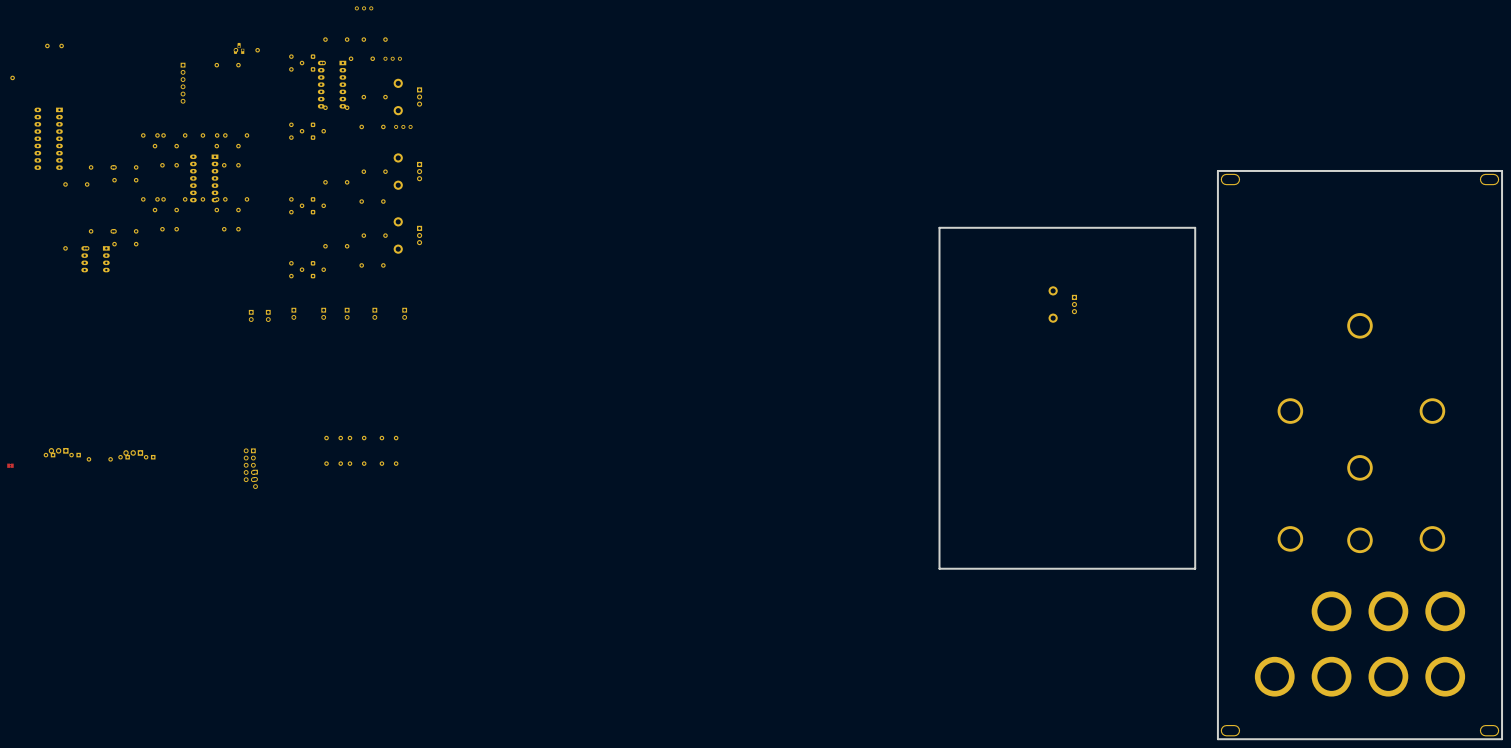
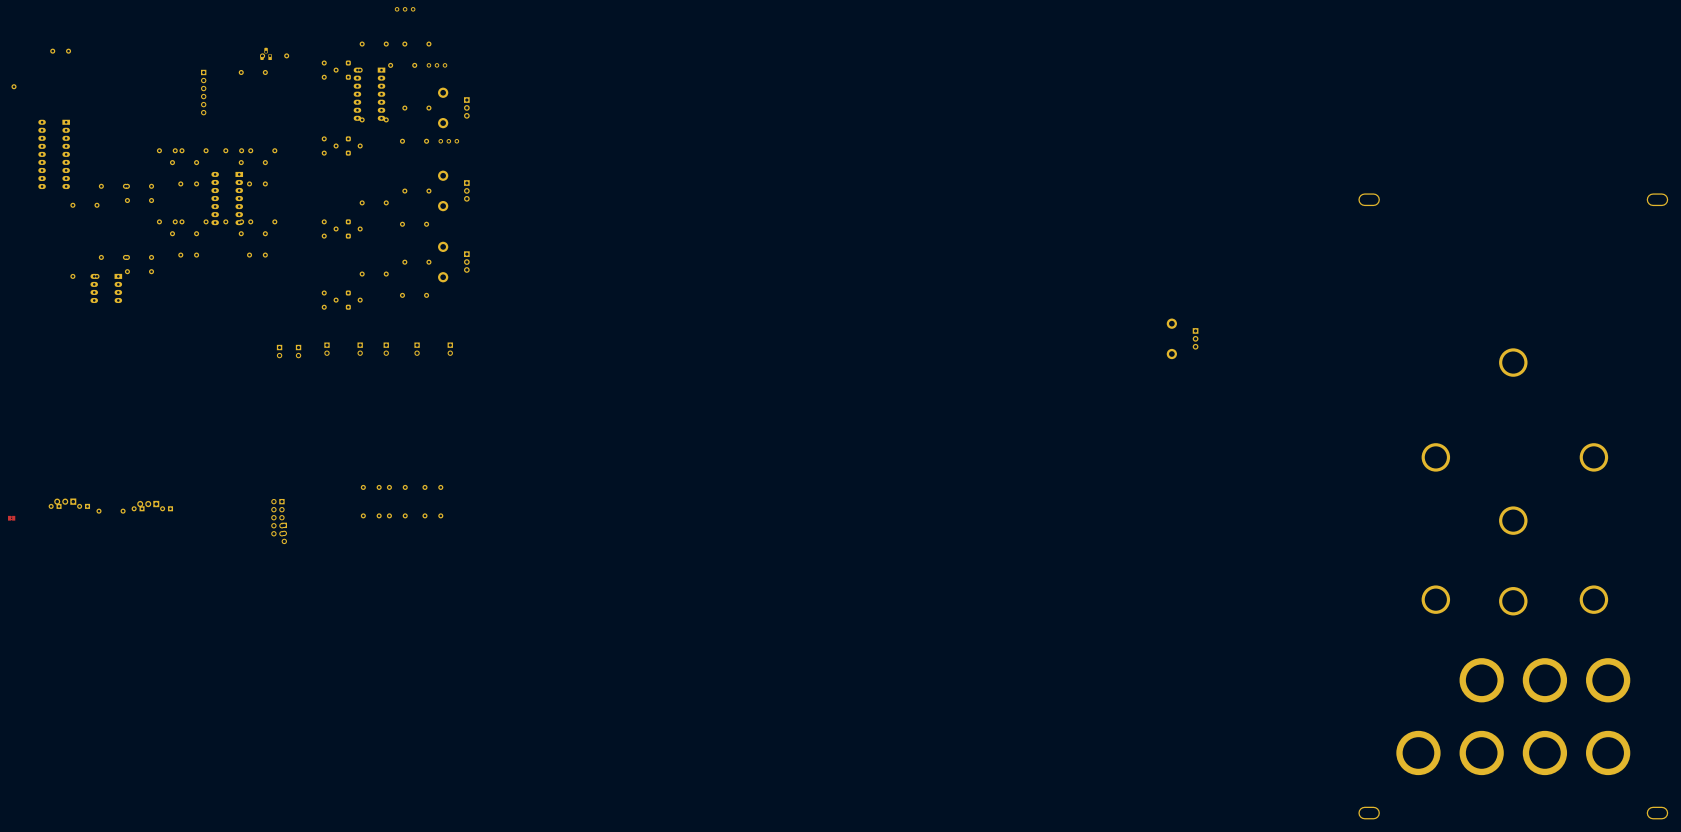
board edge: (1502, 170) (1502, 739) (1217, 739) (1217, 170) (1502, 170) -> none
board edge: (1195, 227) (939, 227) (939, 568) (1195, 568) (1195, 227) -> none

